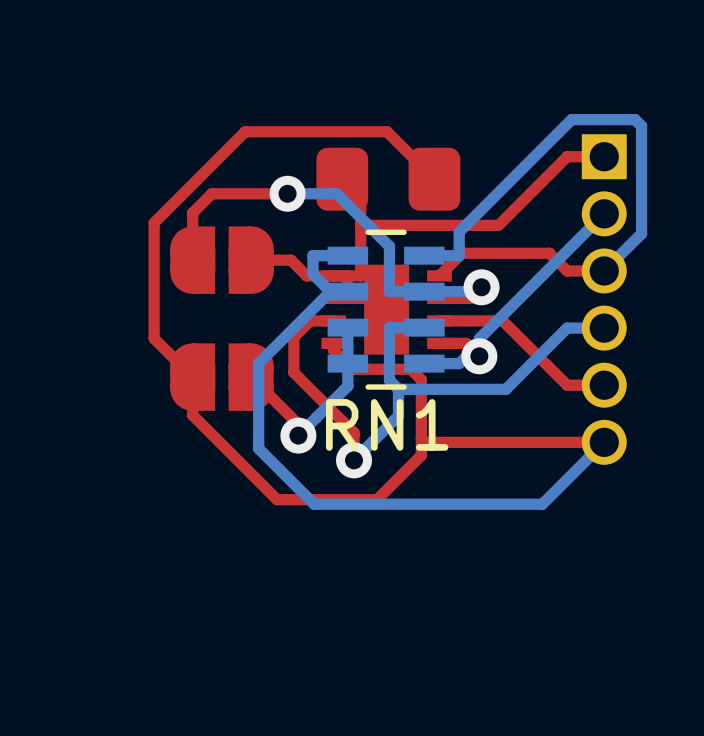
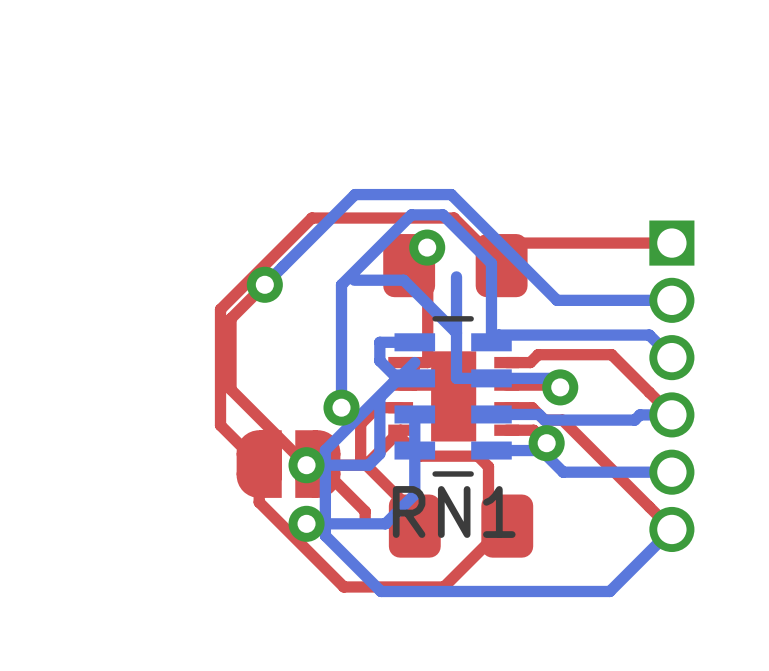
top track: (567, 156) (498, 225) (360, 225) -> (634, 243) (490, 243) (485, 247)
via: none -> (427, 247)
top track: (287, 193) (211, 193) (192, 212) (192, 260) -> none
via: (287, 193) -> none
top track: none -> (264, 284) (231, 318) (231, 389) (306, 465) (365, 465) (400, 430)
bottom track: none -> (264, 284) (355, 194) (451, 194) (557, 300) (671, 300)
via: none -> (264, 284)
bottom track: (604, 213) (479, 338) (479, 356) (466, 356) (459, 363) -> (671, 472) (563, 472) (541, 450) (526, 450)
bottom track: (424, 255) (459, 255) (459, 232) (571, 119) (635, 119) (641, 126) (641, 233) (604, 270) -> (341, 407) (341, 284) (411, 214) (442, 214) (491, 263) (491, 342) (498, 335) (649, 335) (671, 357)
part: (221, 260) -> none
top track: (251, 260) (291, 260) (306, 275) (333, 275) -> none
top track: (604, 270) (567, 270) (549, 253) (462, 253) (439, 275) -> (671, 414) (611, 354) (538, 354) (530, 362) (506, 362)
bottom track: none -> (414, 362) (379, 397) (379, 453) (368, 465) (306, 465)
via position: (481, 287) -> (560, 387)
via: none -> (341, 407)
top track: (464, 320) (502, 320) (567, 385) (604, 385) -> (532, 407) (544, 420) (562, 420) (671, 529)
bottom track: (424, 327) (389, 327) (389, 380) (398, 389) -> none
bottom track: (572, 328) (567, 328) (505, 389) (398, 389) -> (639, 414) (634, 420) (544, 420) (538, 414) (491, 414)
via: none -> (306, 465)
bottom track: (347, 386) (298, 435) -> (414, 473) (414, 494) (385, 523) (306, 523)
bottom track: (398, 389) (398, 415) (354, 460) -> none
via: (298, 435) -> none
via: none -> (306, 523)
part: none -> (461, 526)
top track: (421, 438) (425, 442) (604, 442) -> none
via: (354, 460) -> none

